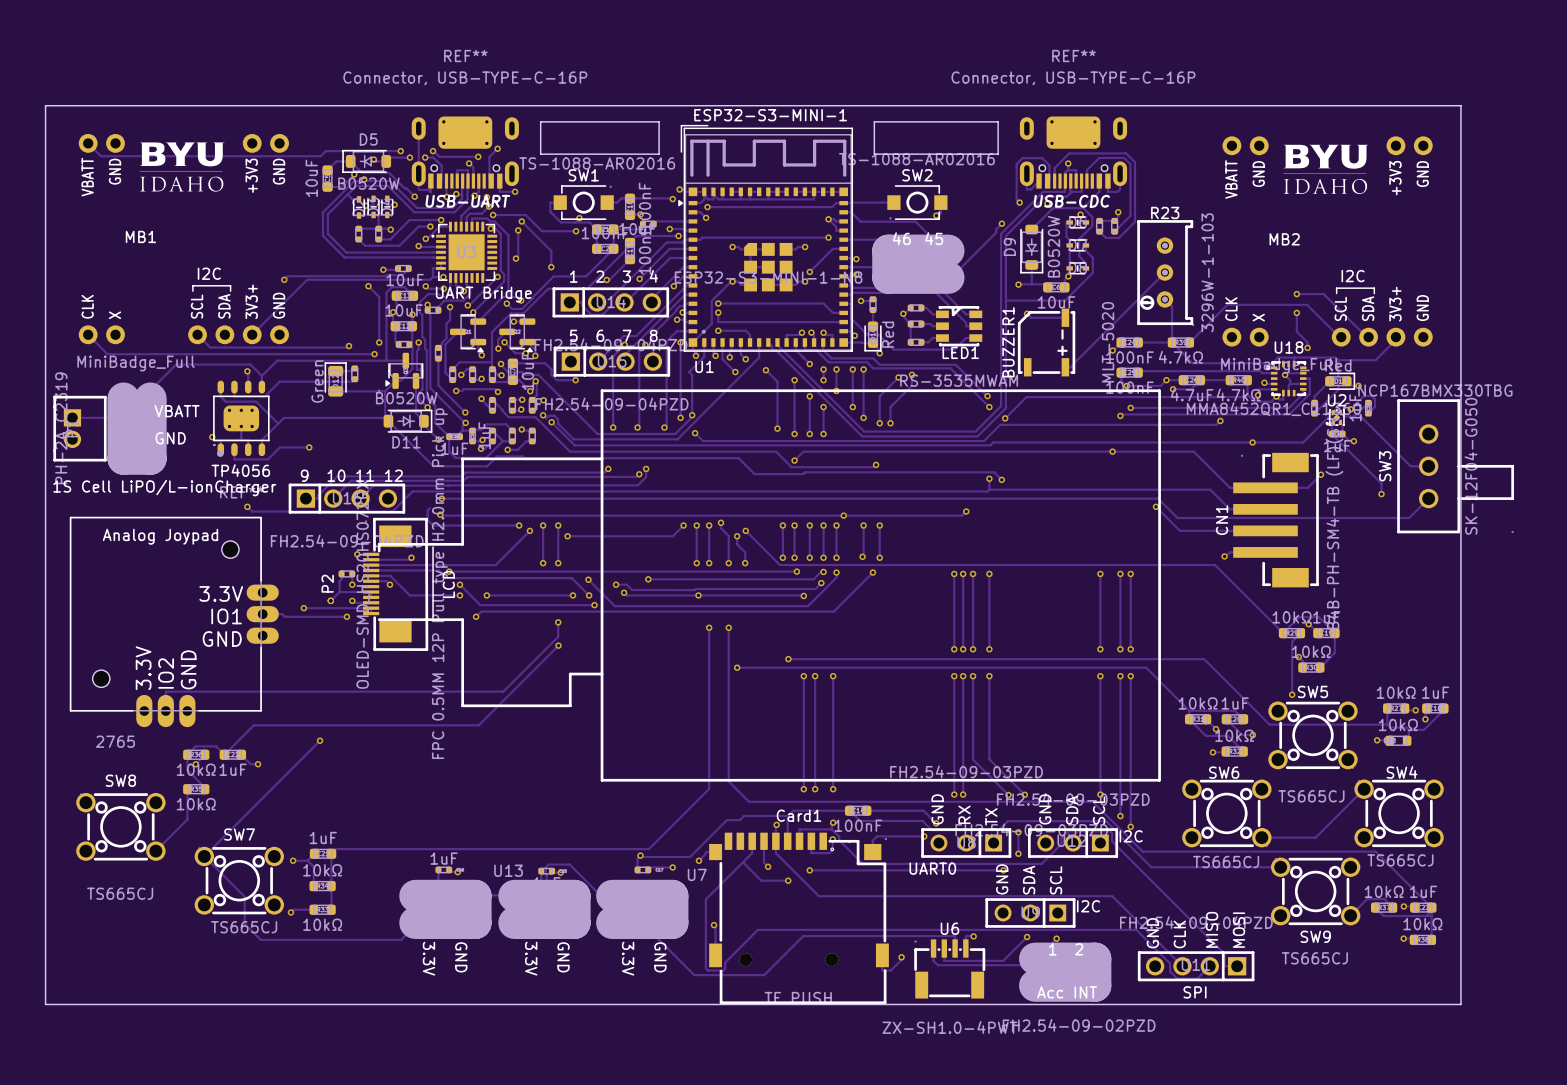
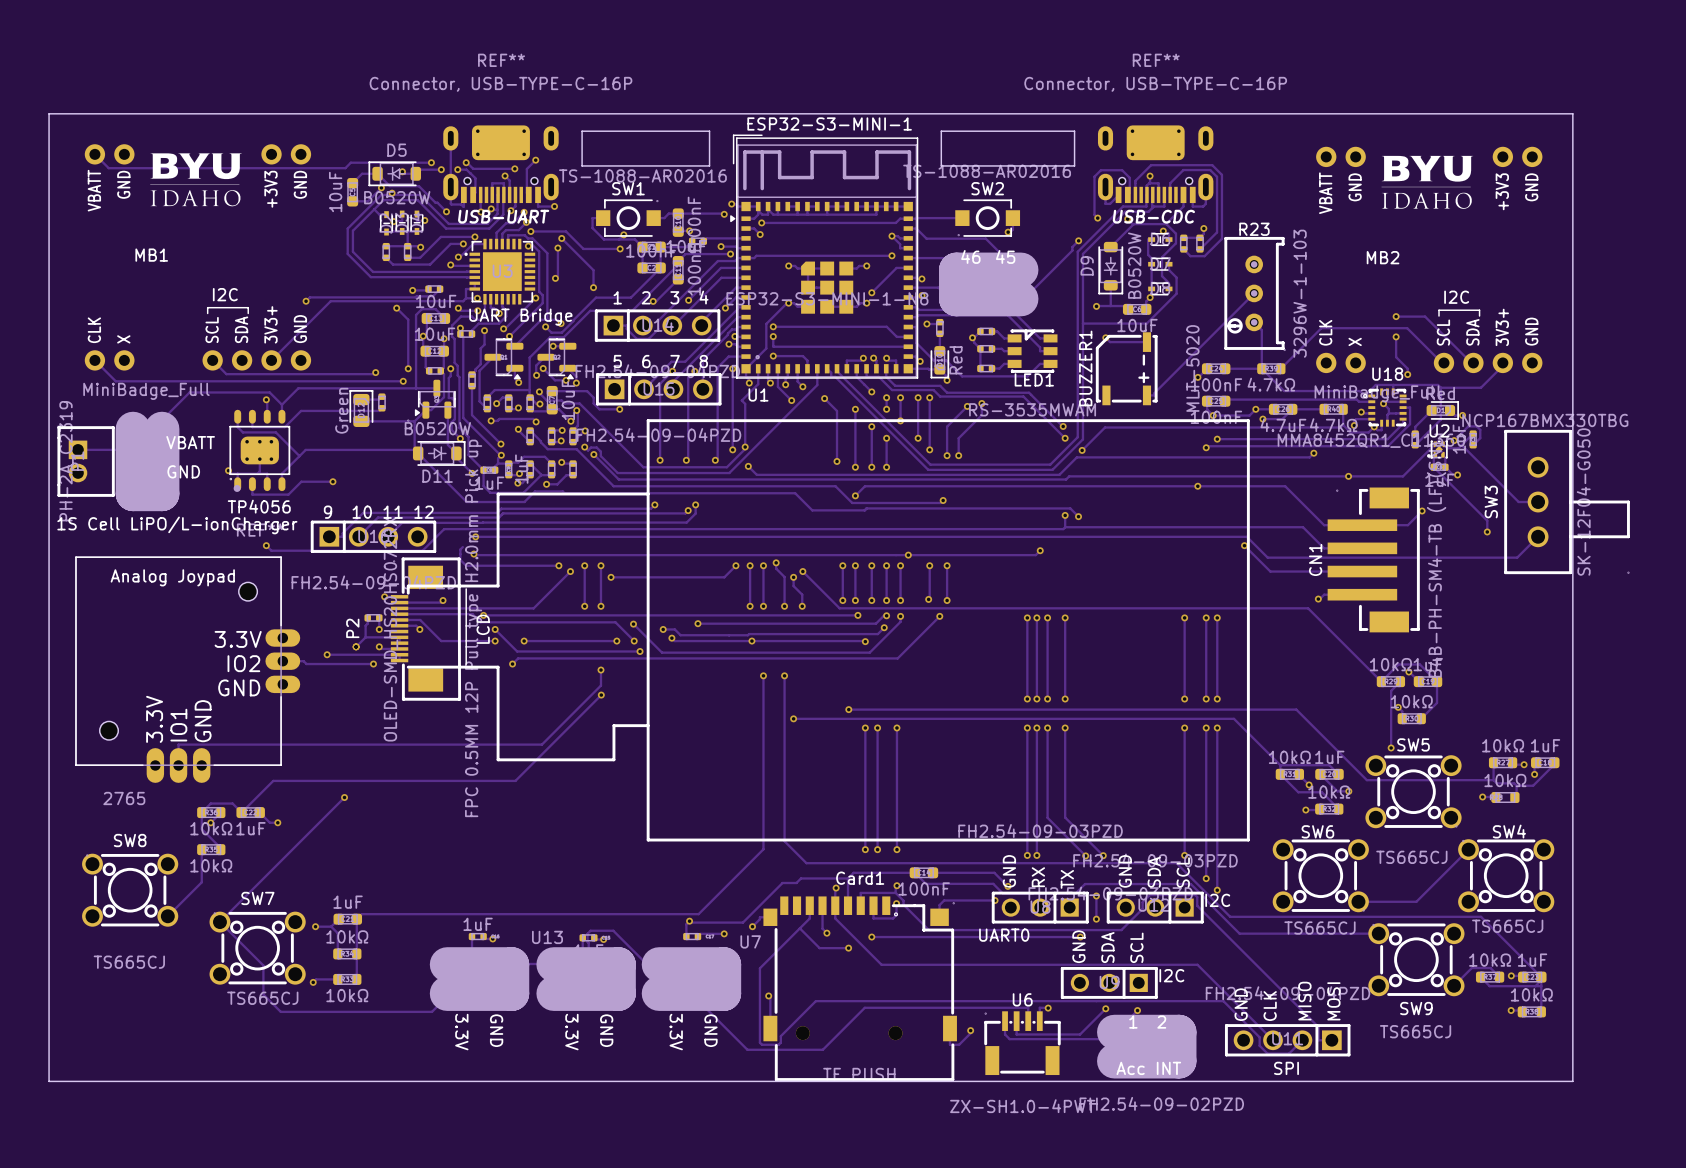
text: IO1 (226, 616) -> IO2 (243, 663)
text: IO2 (166, 673) -> IO1 (178, 725)

